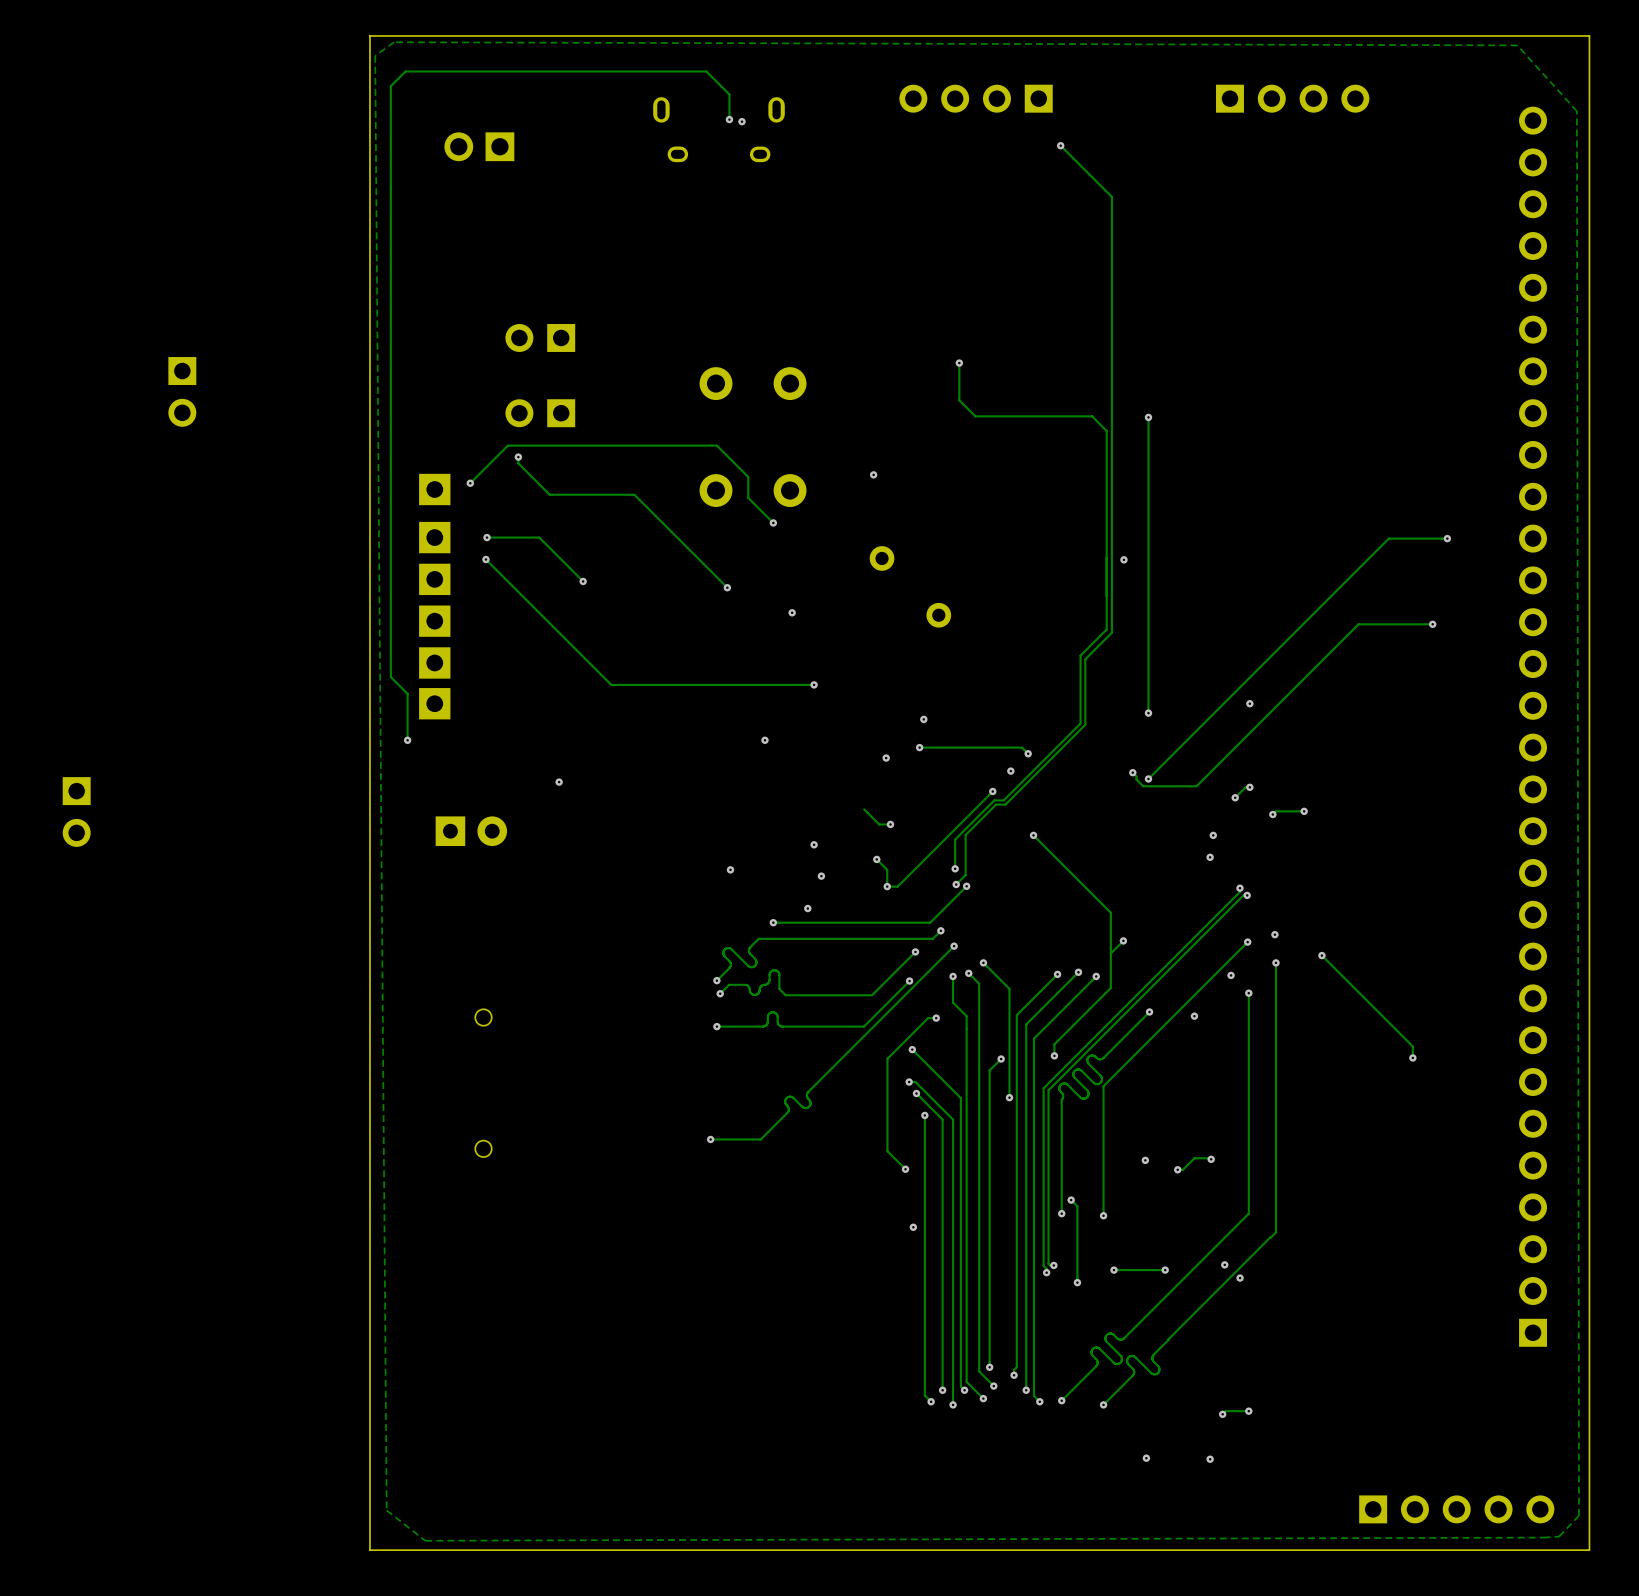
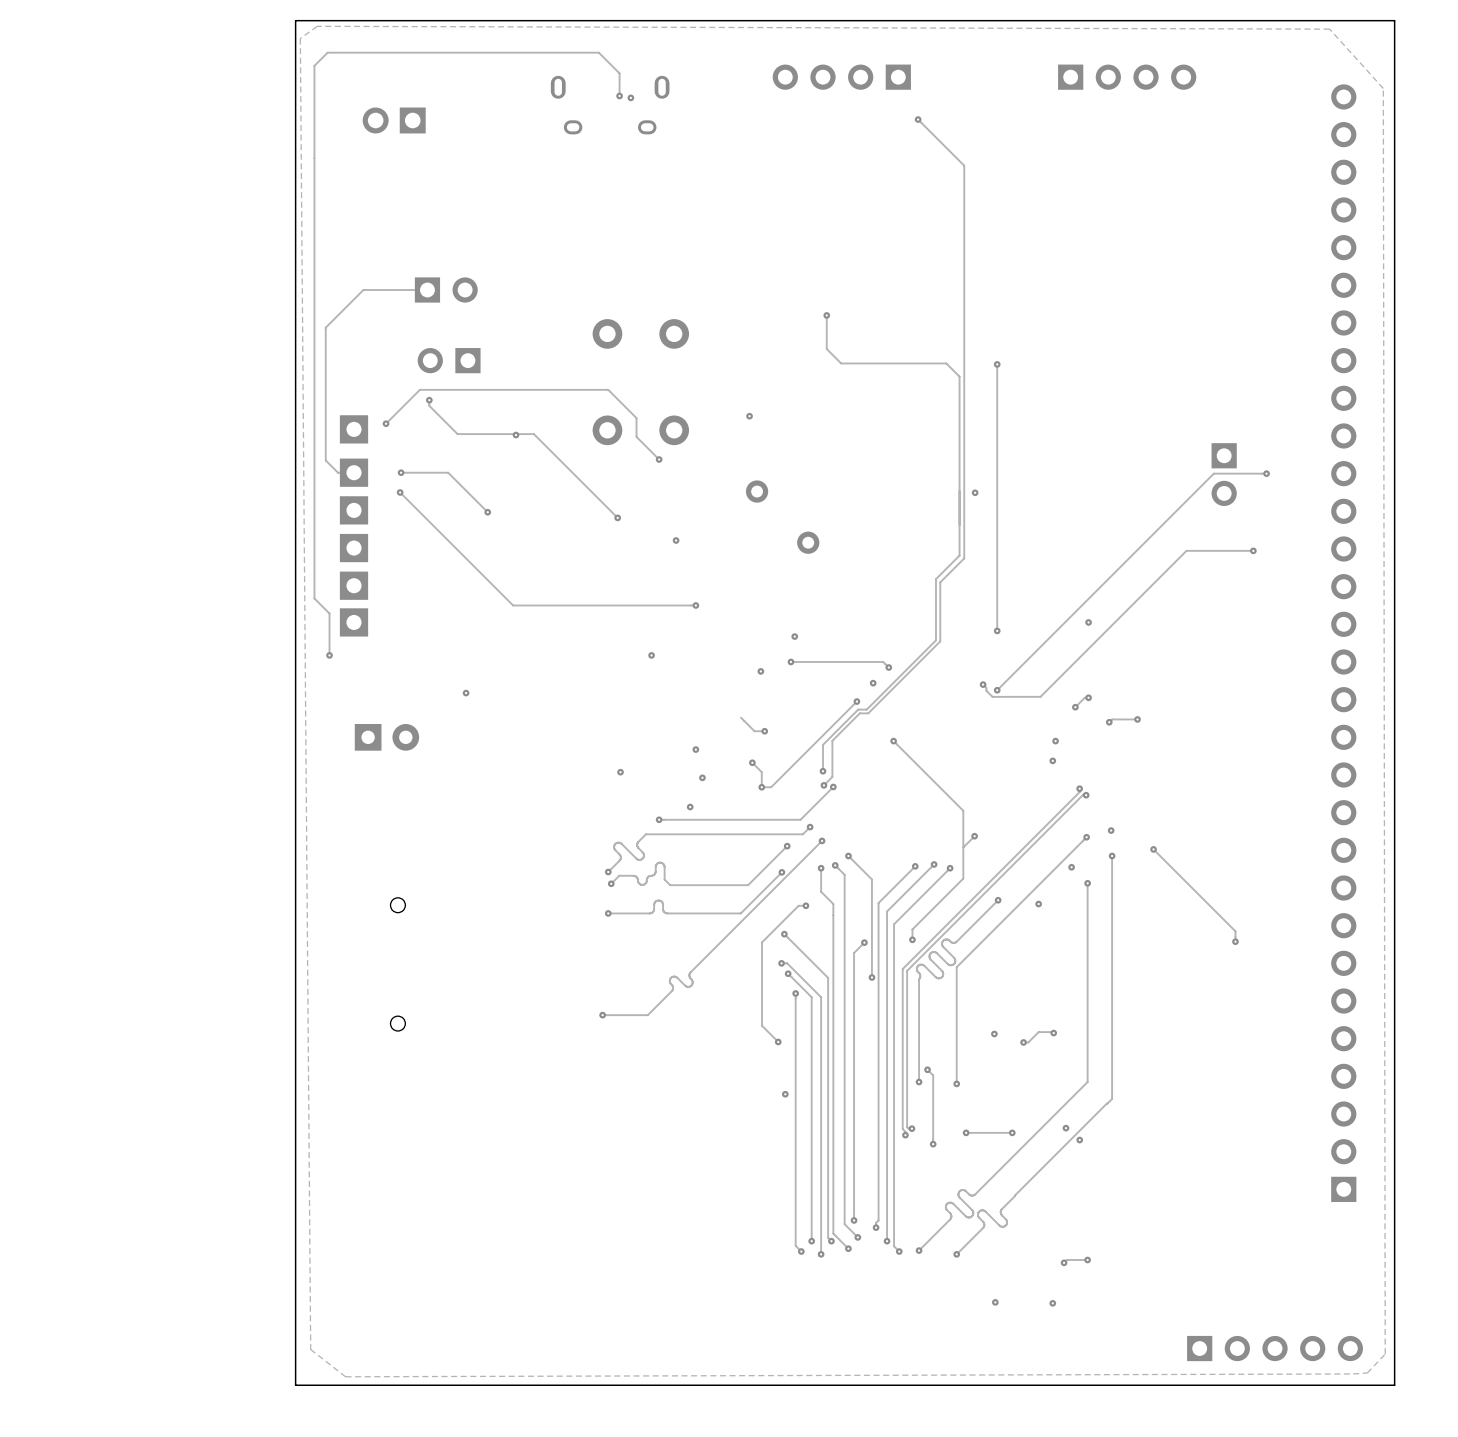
track: none -> (427, 290) (363, 290) (325, 327) (325, 460) (337, 472) (354, 472)
part rotation: 0° (540, 337) -> 180° (446, 290)
part: (182, 391) -> none
via: none -> (515, 435)
part: none -> (1224, 474)
part: (76, 812) -> none

